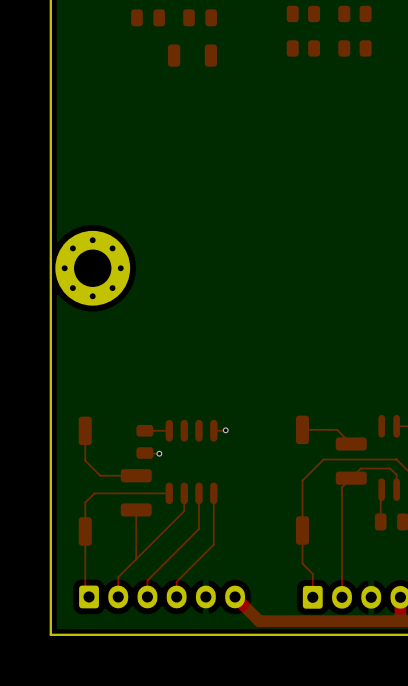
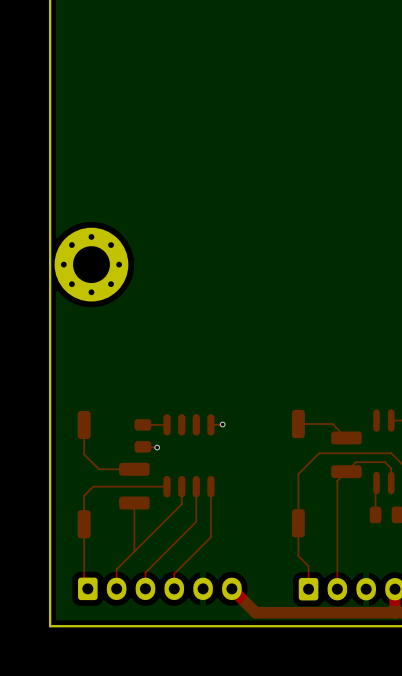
part: (303, 13) -> none
part: (354, 13) -> none
part: (148, 17) -> none
part: (200, 17) -> none
part: (303, 48) -> none
part: (354, 48) -> none
part: (192, 55) -> none

